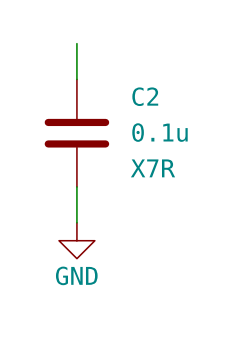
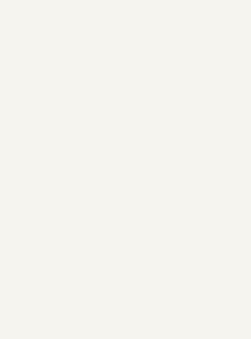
wire: (76, 43) (76, 79) -> none
C2: 0.1u (76, 133) -> none
wire: (76, 186) (76, 222) -> none
power symbol: GND (76, 240) -> none

